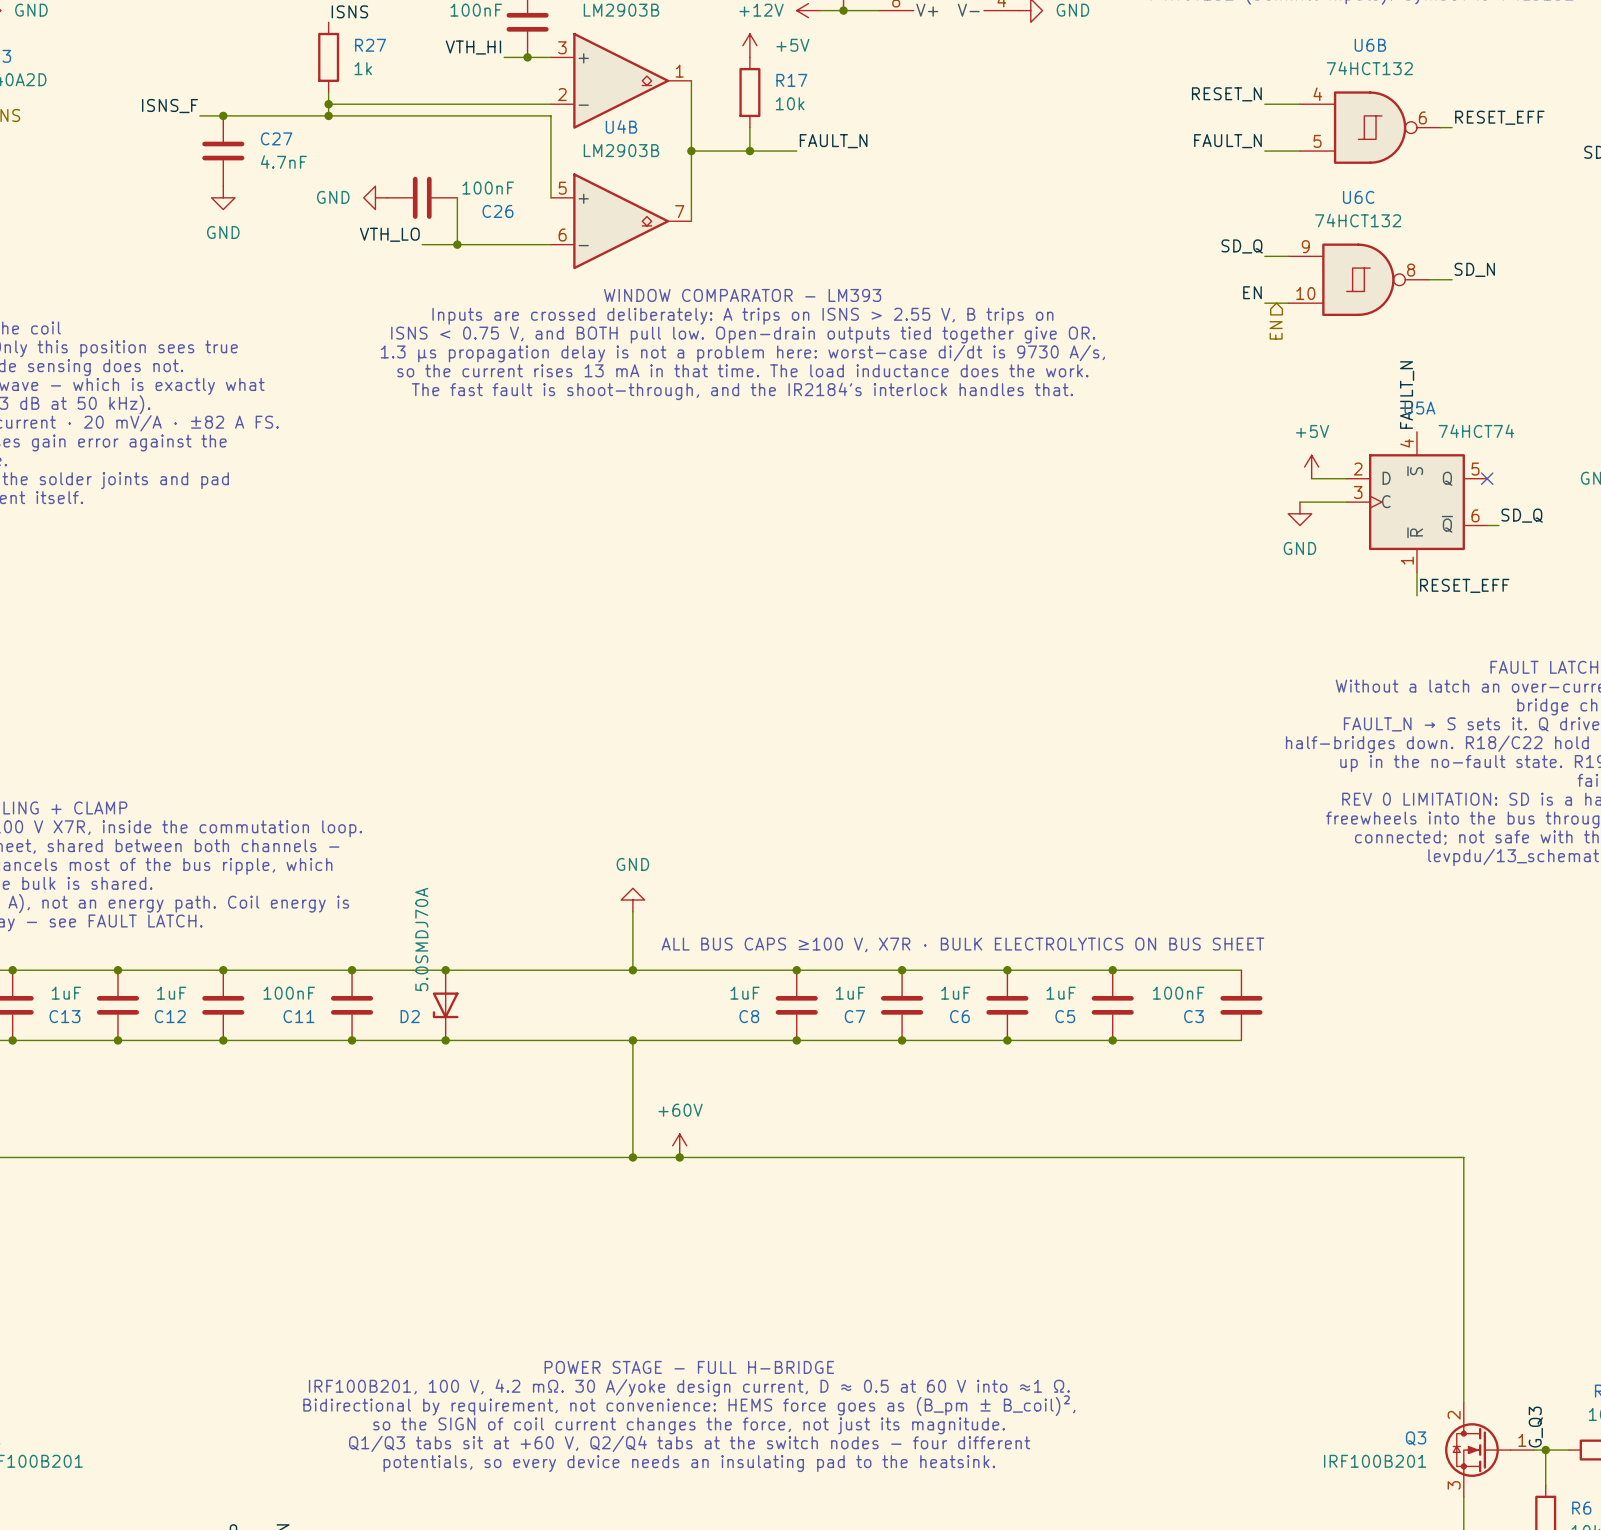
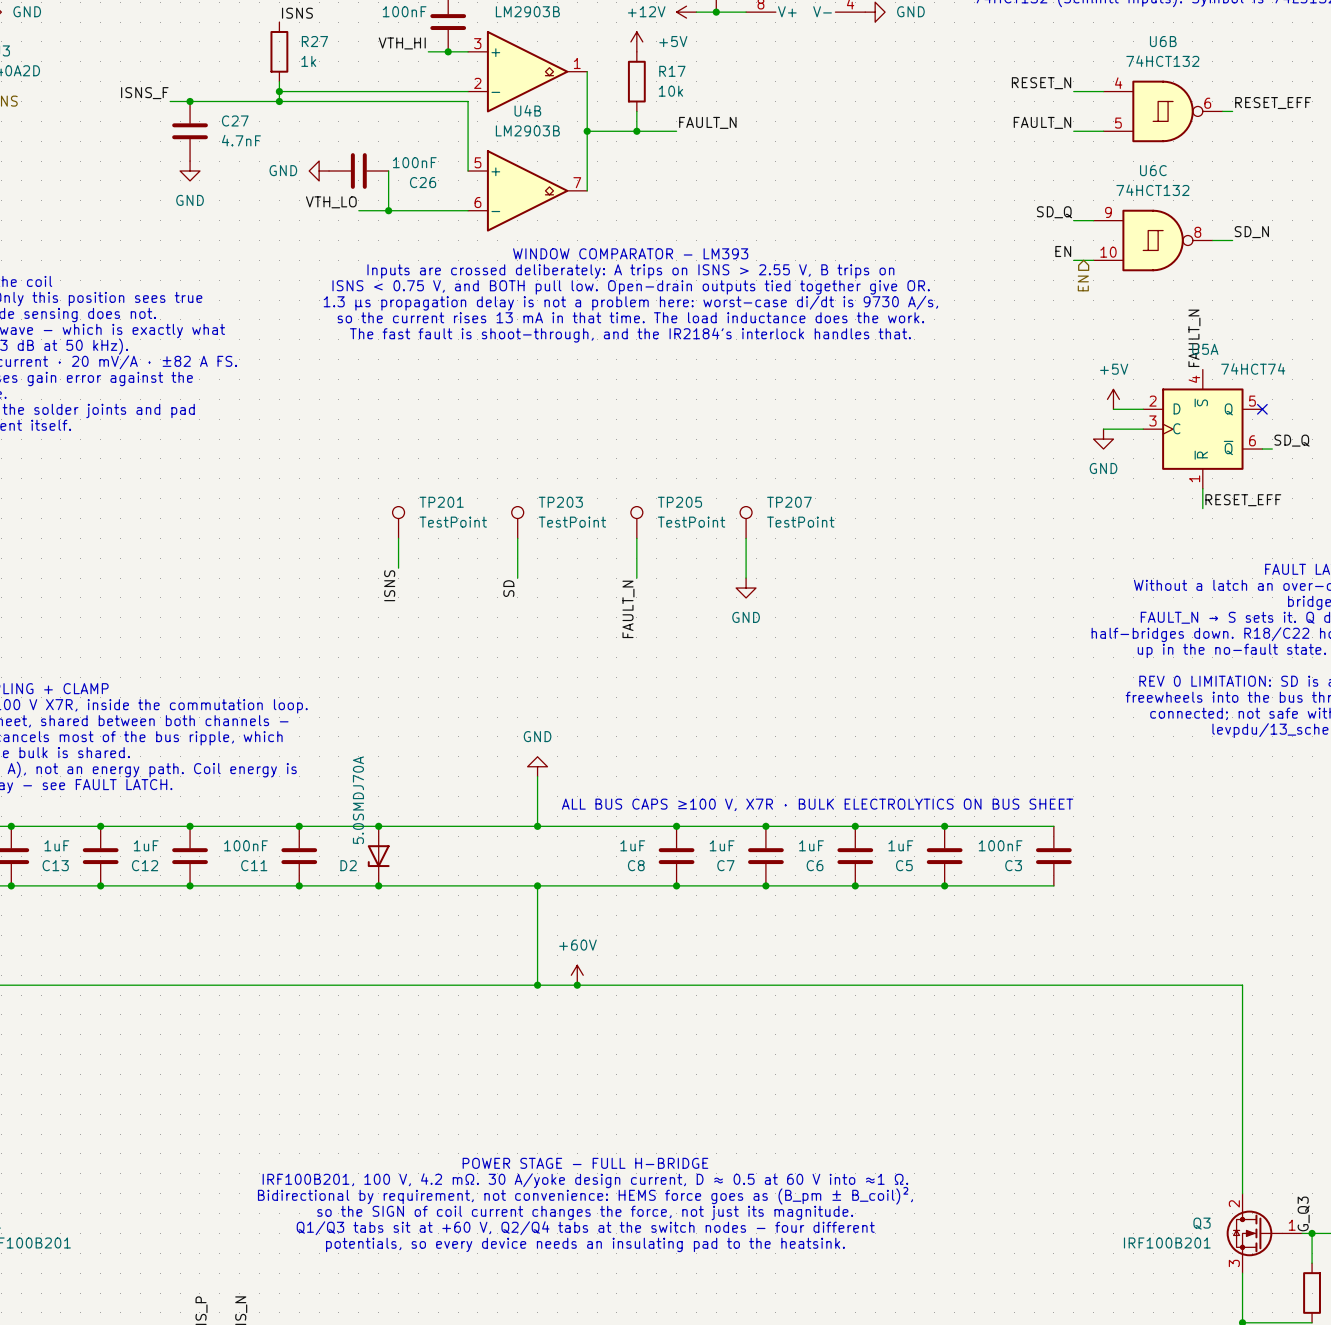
TP201: none -> TestPoint (398, 522)
TP203: none -> TestPoint (517, 522)
TP205: none -> TestPoint (636, 522)
TP207: none -> TestPoint (746, 522)
wire: none -> (398, 538) (398, 568)
wire: none -> (517, 538) (517, 578)
wire: none -> (636, 538) (636, 578)
wire: none -> (746, 538) (746, 578)
label: none -> ISNS (389, 585)
power symbol: none -> GND (746, 588)
label: none -> SD (508, 588)
label: none -> FAULT_N (628, 609)

